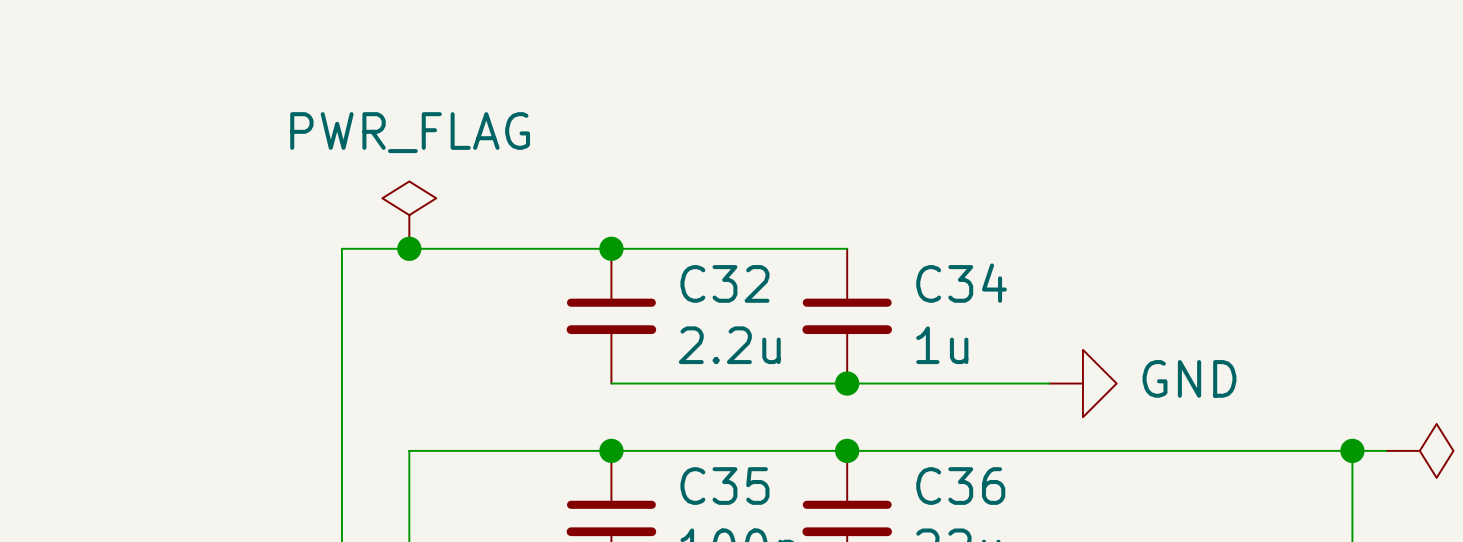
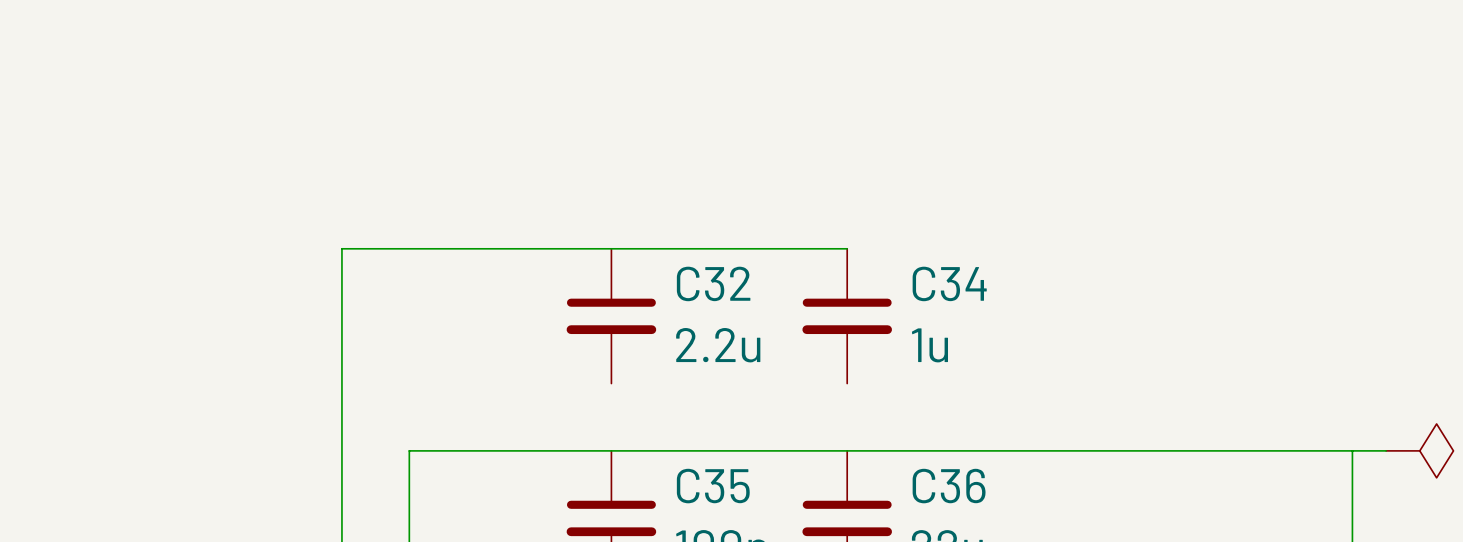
power symbol: PWR_FLAG (409, 215) -> none
junction: (409, 248) -> none
junction: (611, 248) -> none
wire: (611, 383) (1049, 383) -> none
junction: (847, 383) -> none
power symbol: GND (1082, 383) -> none
junction: (611, 450) -> none
junction: (847, 450) -> none
junction: (1352, 450) -> none

